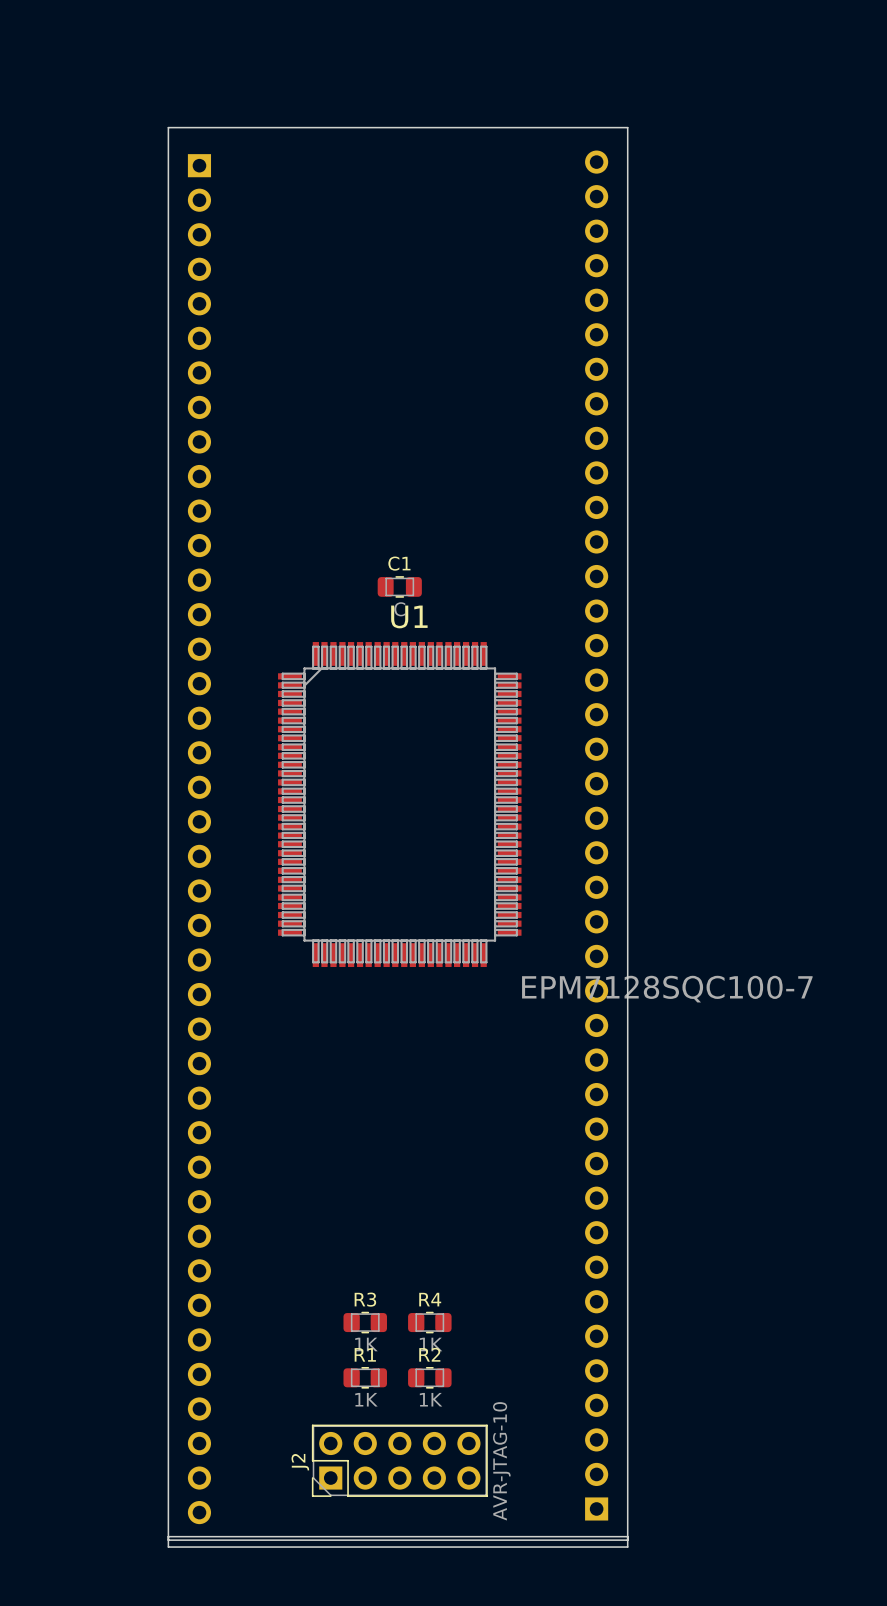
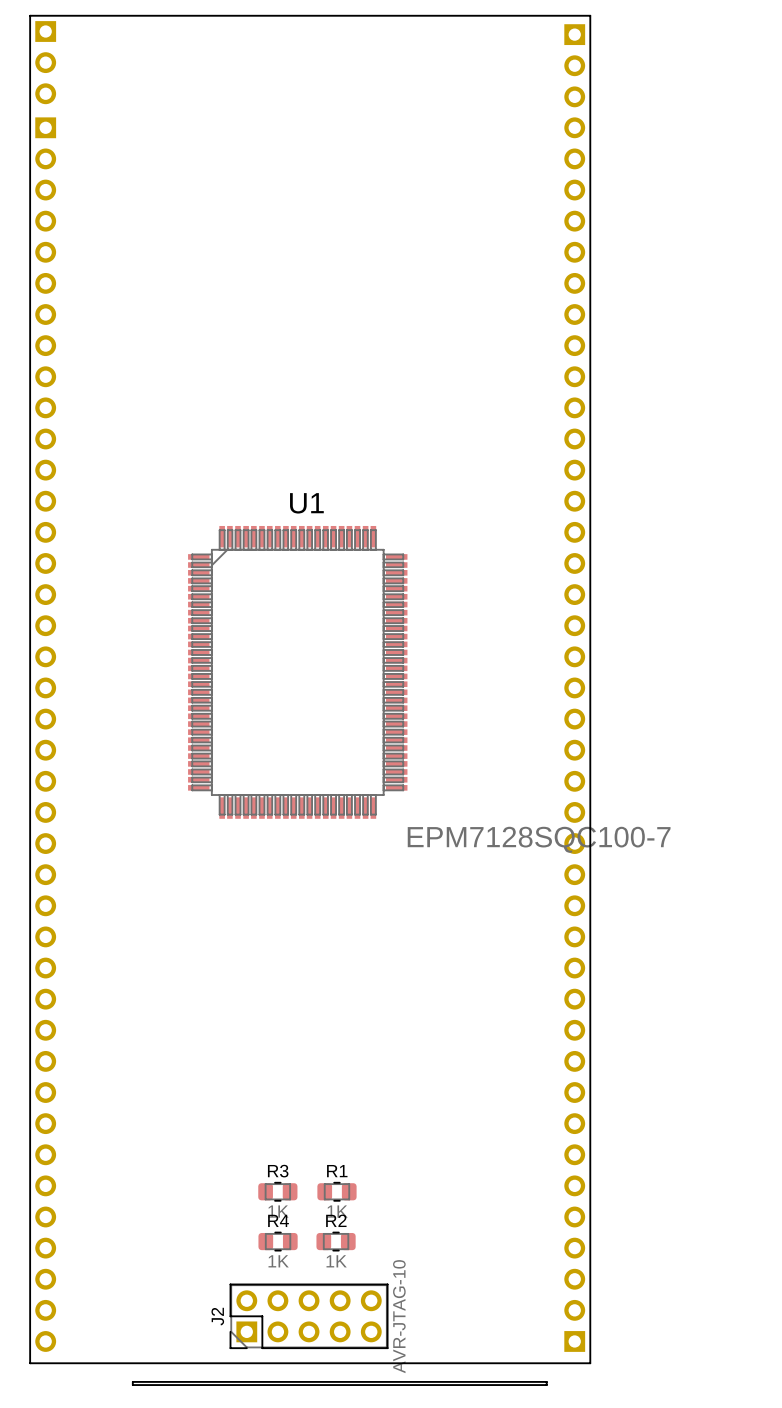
board edge: none -> (30, 15) (590, 15) (590, 1363) (30, 1363) (30, 15)
part: none -> (45, 62)
part: none -> (574, 65)
C1: C (399, 586) -> none
U1 position: (399, 804) -> (297, 672)
part position: (596, 835) -> (574, 734)
part position: (199, 839) -> (45, 734)
R3 position: (365, 1322) -> (277, 1191)
R4 position: (429, 1322) -> (278, 1241)
R1 position: (365, 1377) -> (336, 1191)
R2 position: (429, 1377) -> (336, 1241)
J2 position: (399, 1460) -> (309, 1316)
board edge: (168, 1536) (168, 127) (627, 127) (627, 1536) -> none
board edge: (168, 1540) (168, 1547) (627, 1547) (627, 1540) -> none

